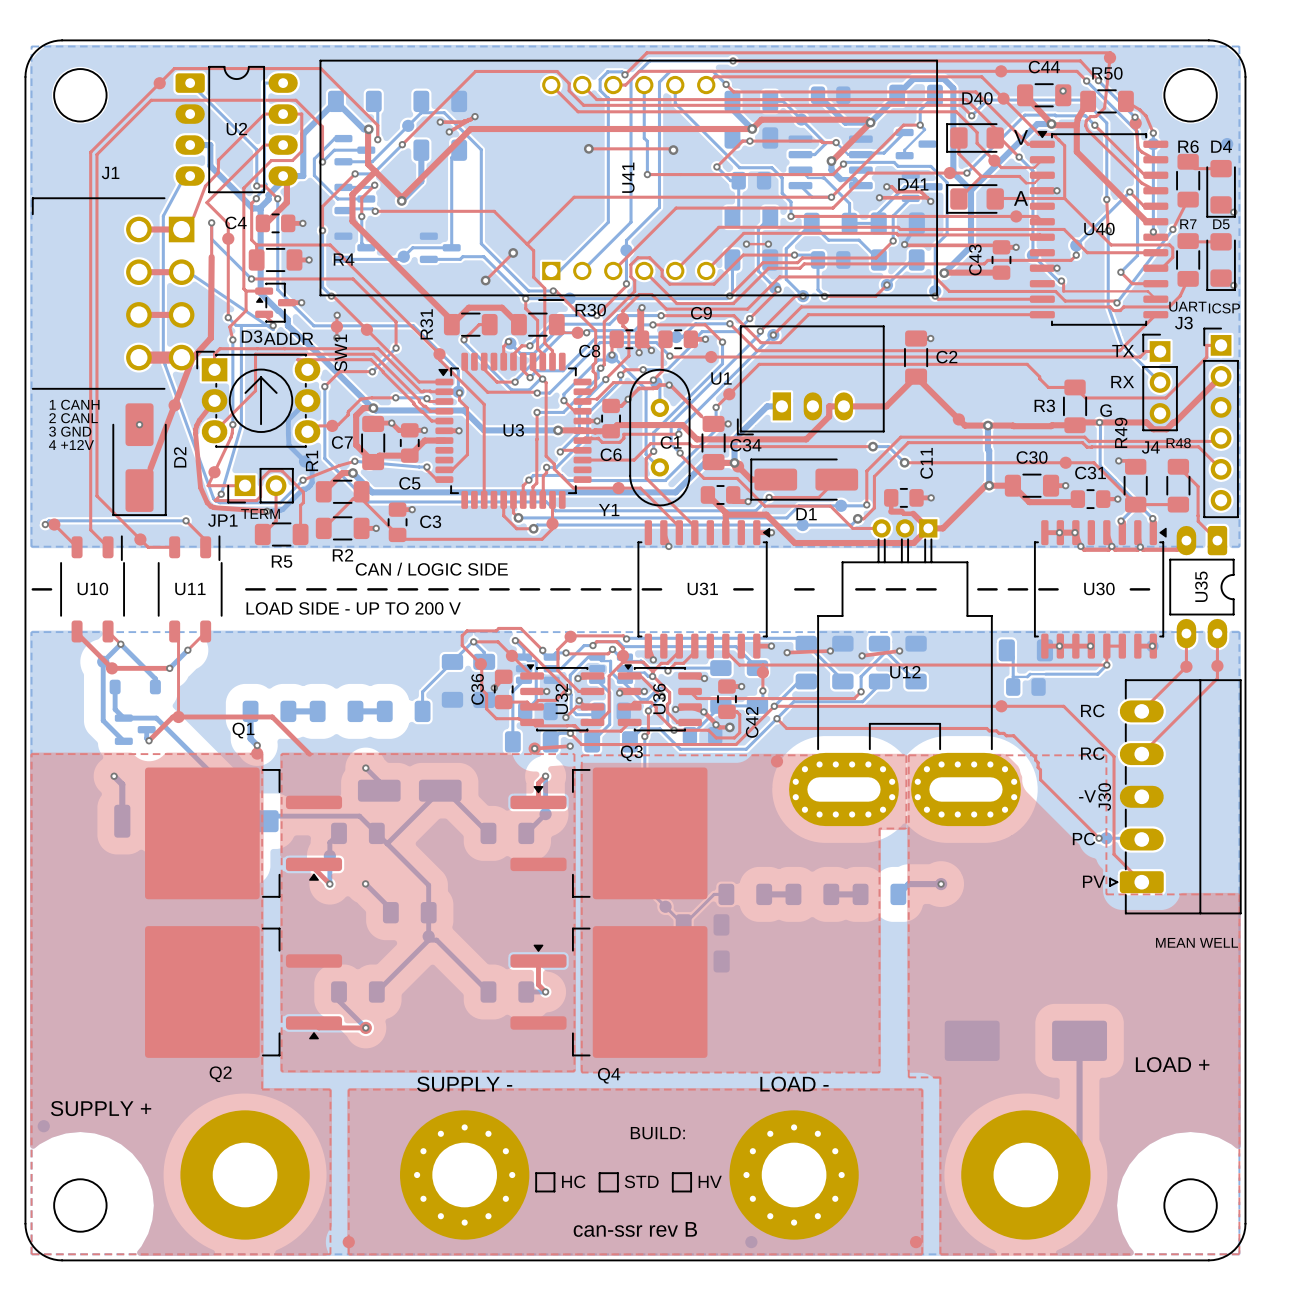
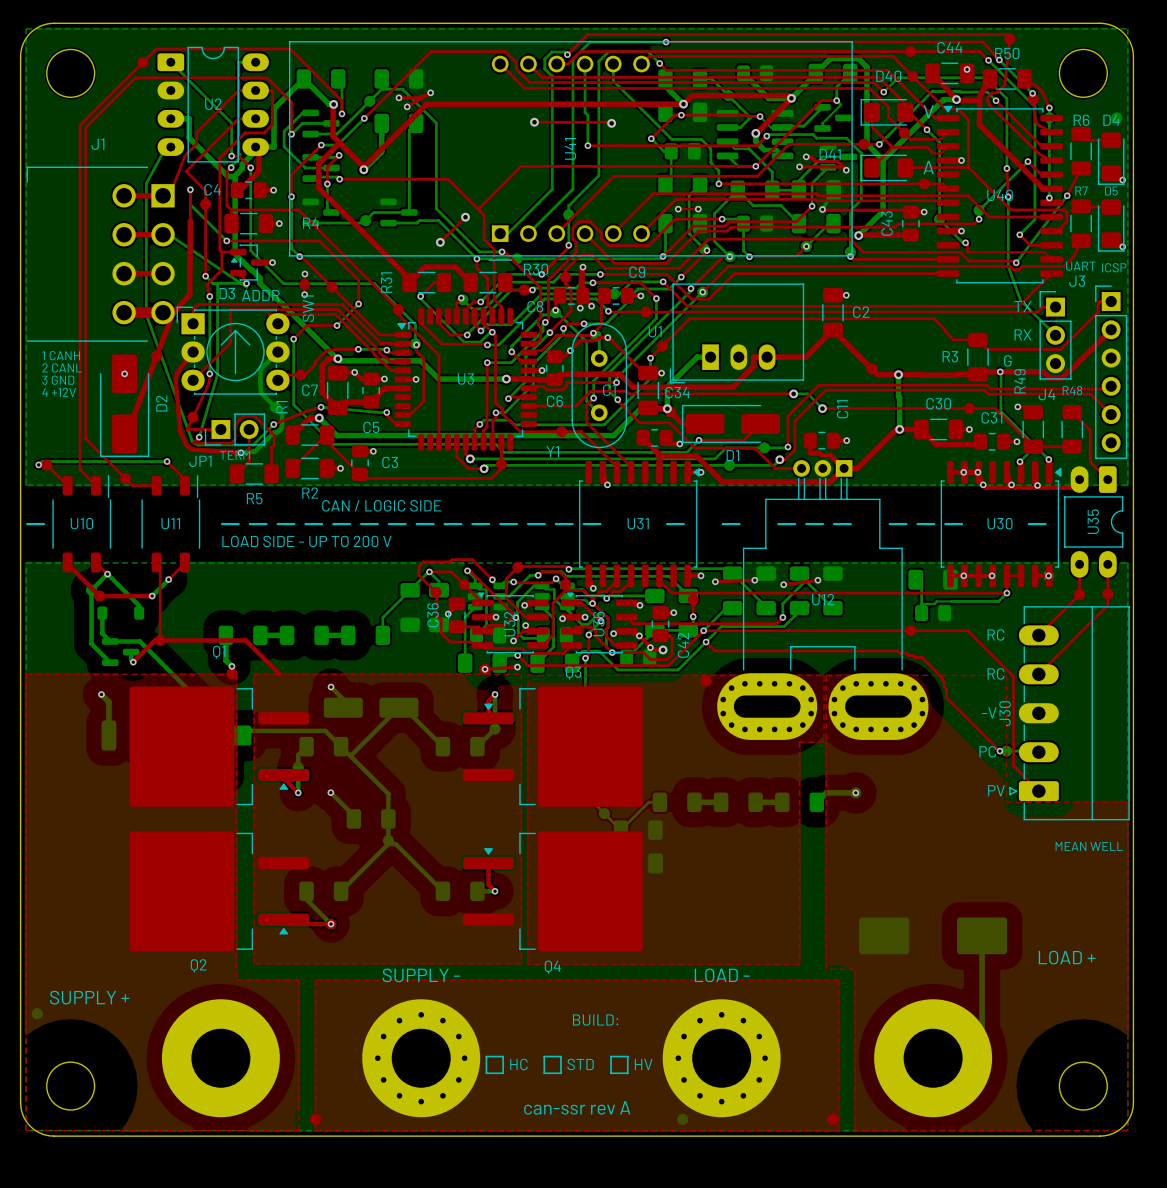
text: can-ssr rev B (635, 1229) -> can-ssr rev A (577, 1107)

